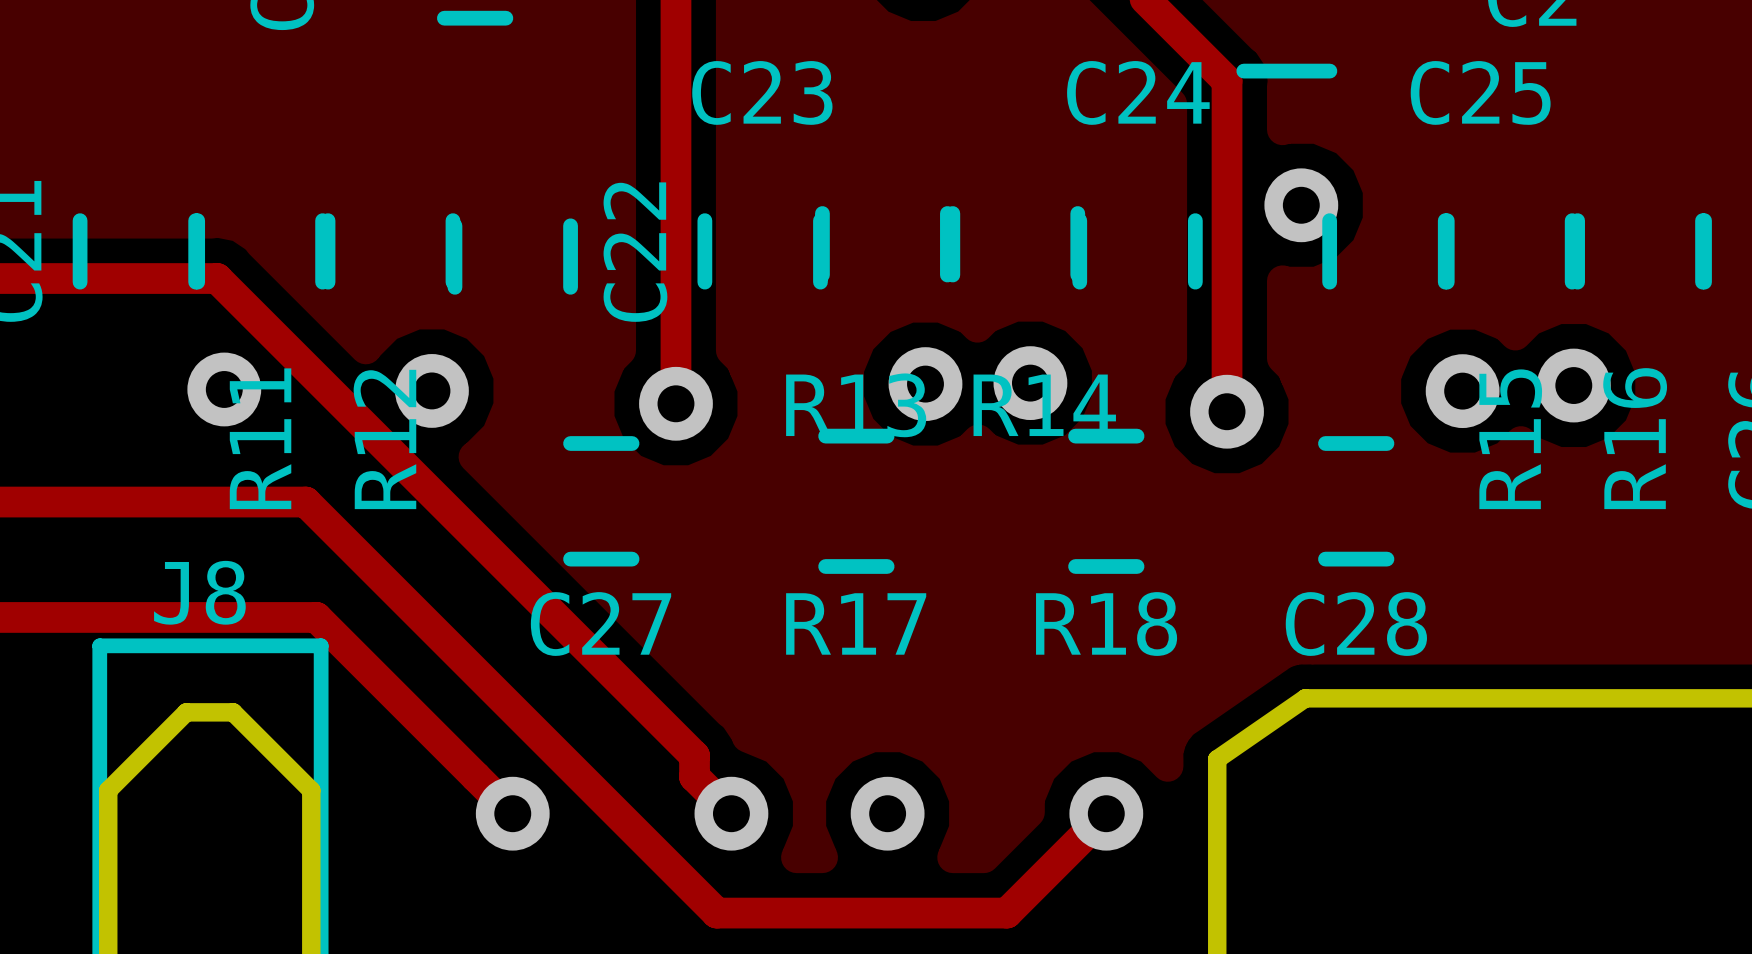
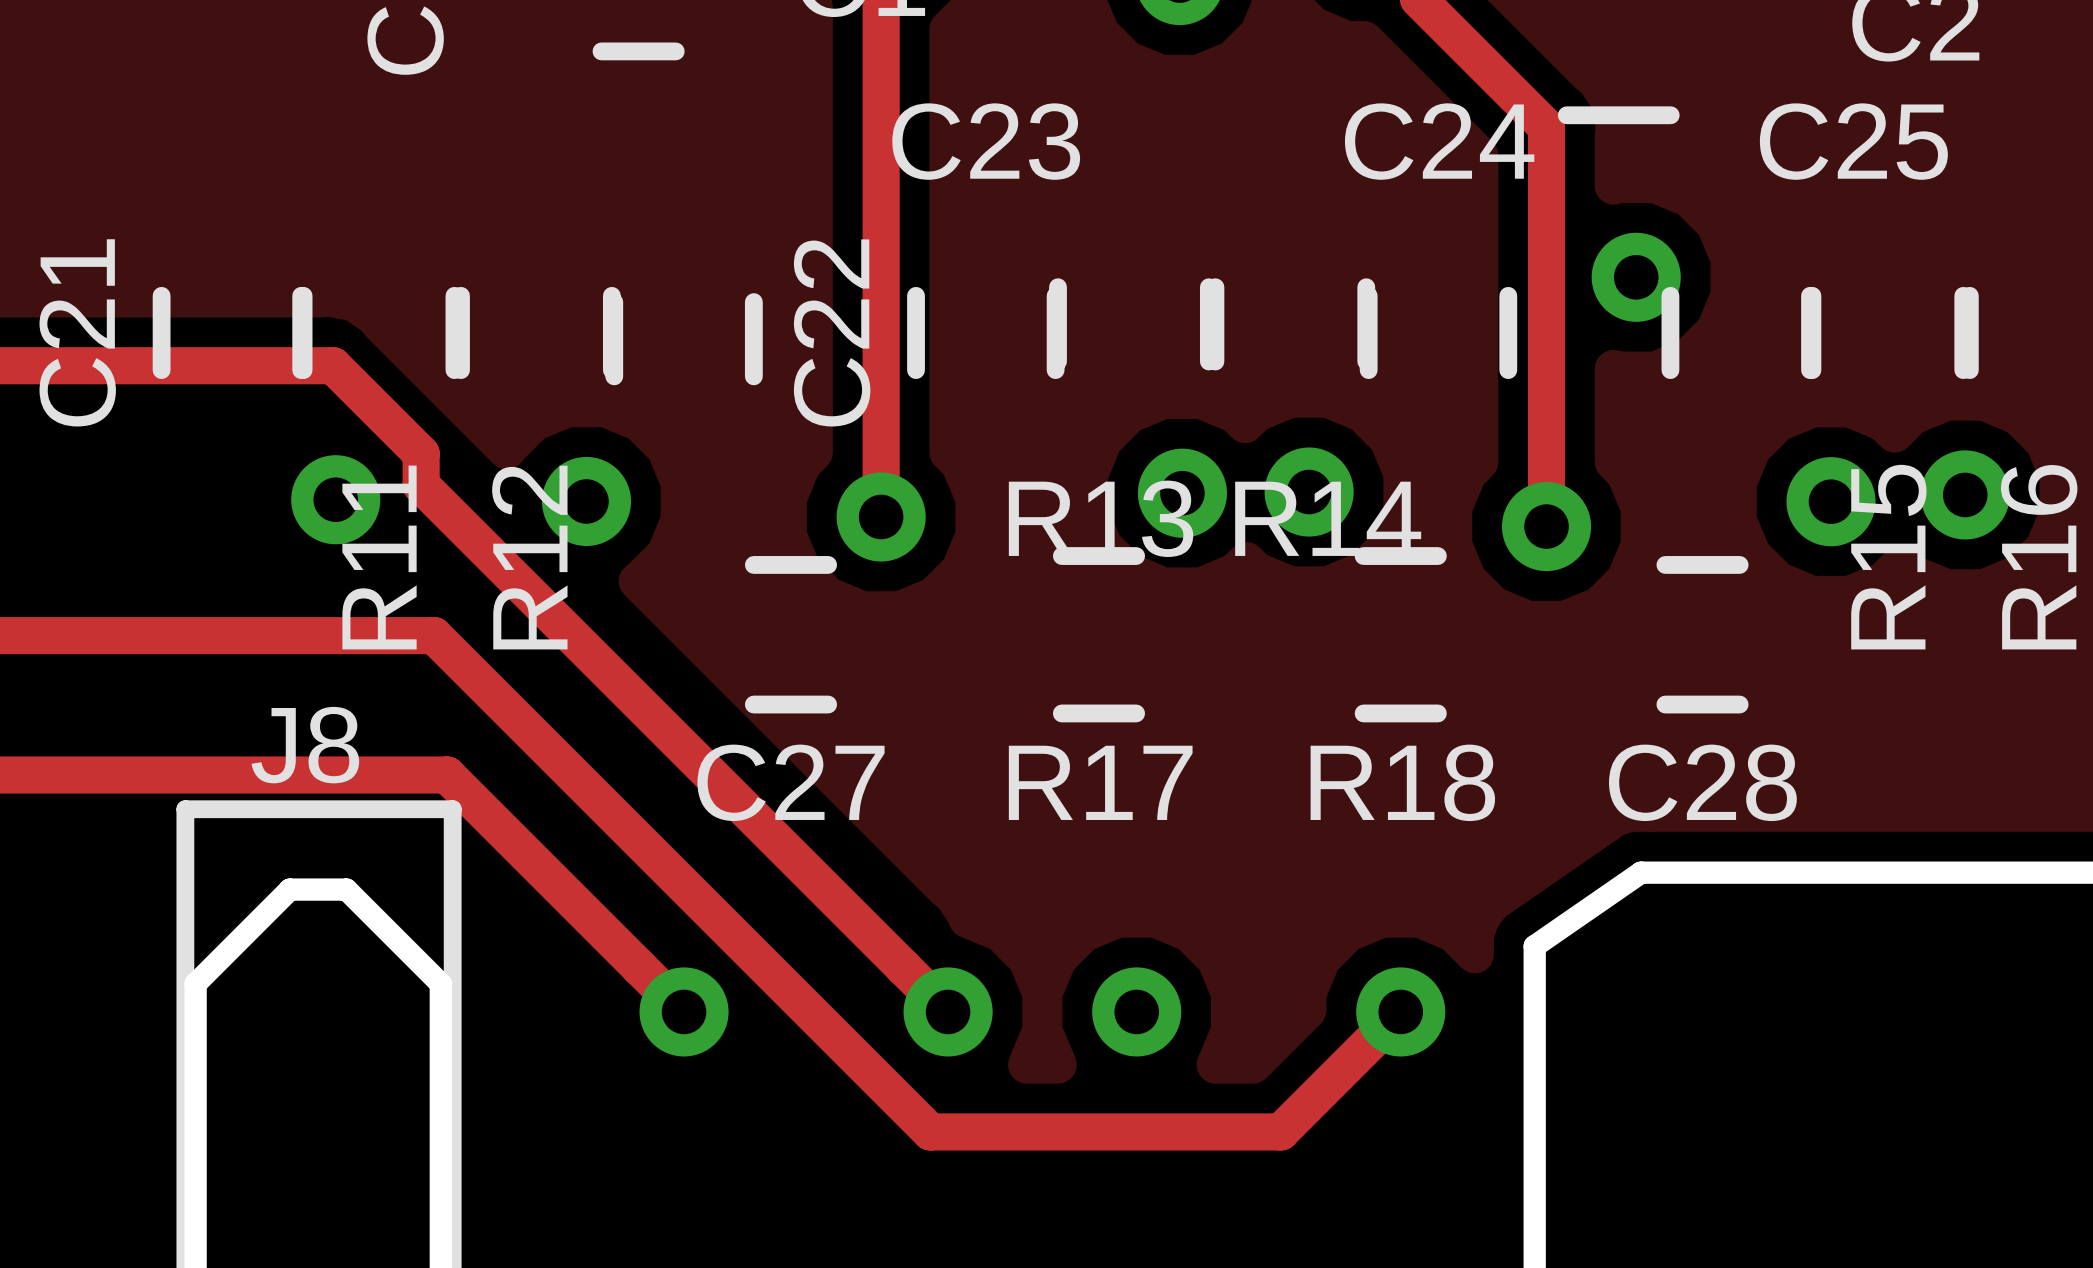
track: (217, 278) (694, 755) (694, 776) -> (327, 365) (333, 365) (421, 453) (421, 484) (903, 967)

